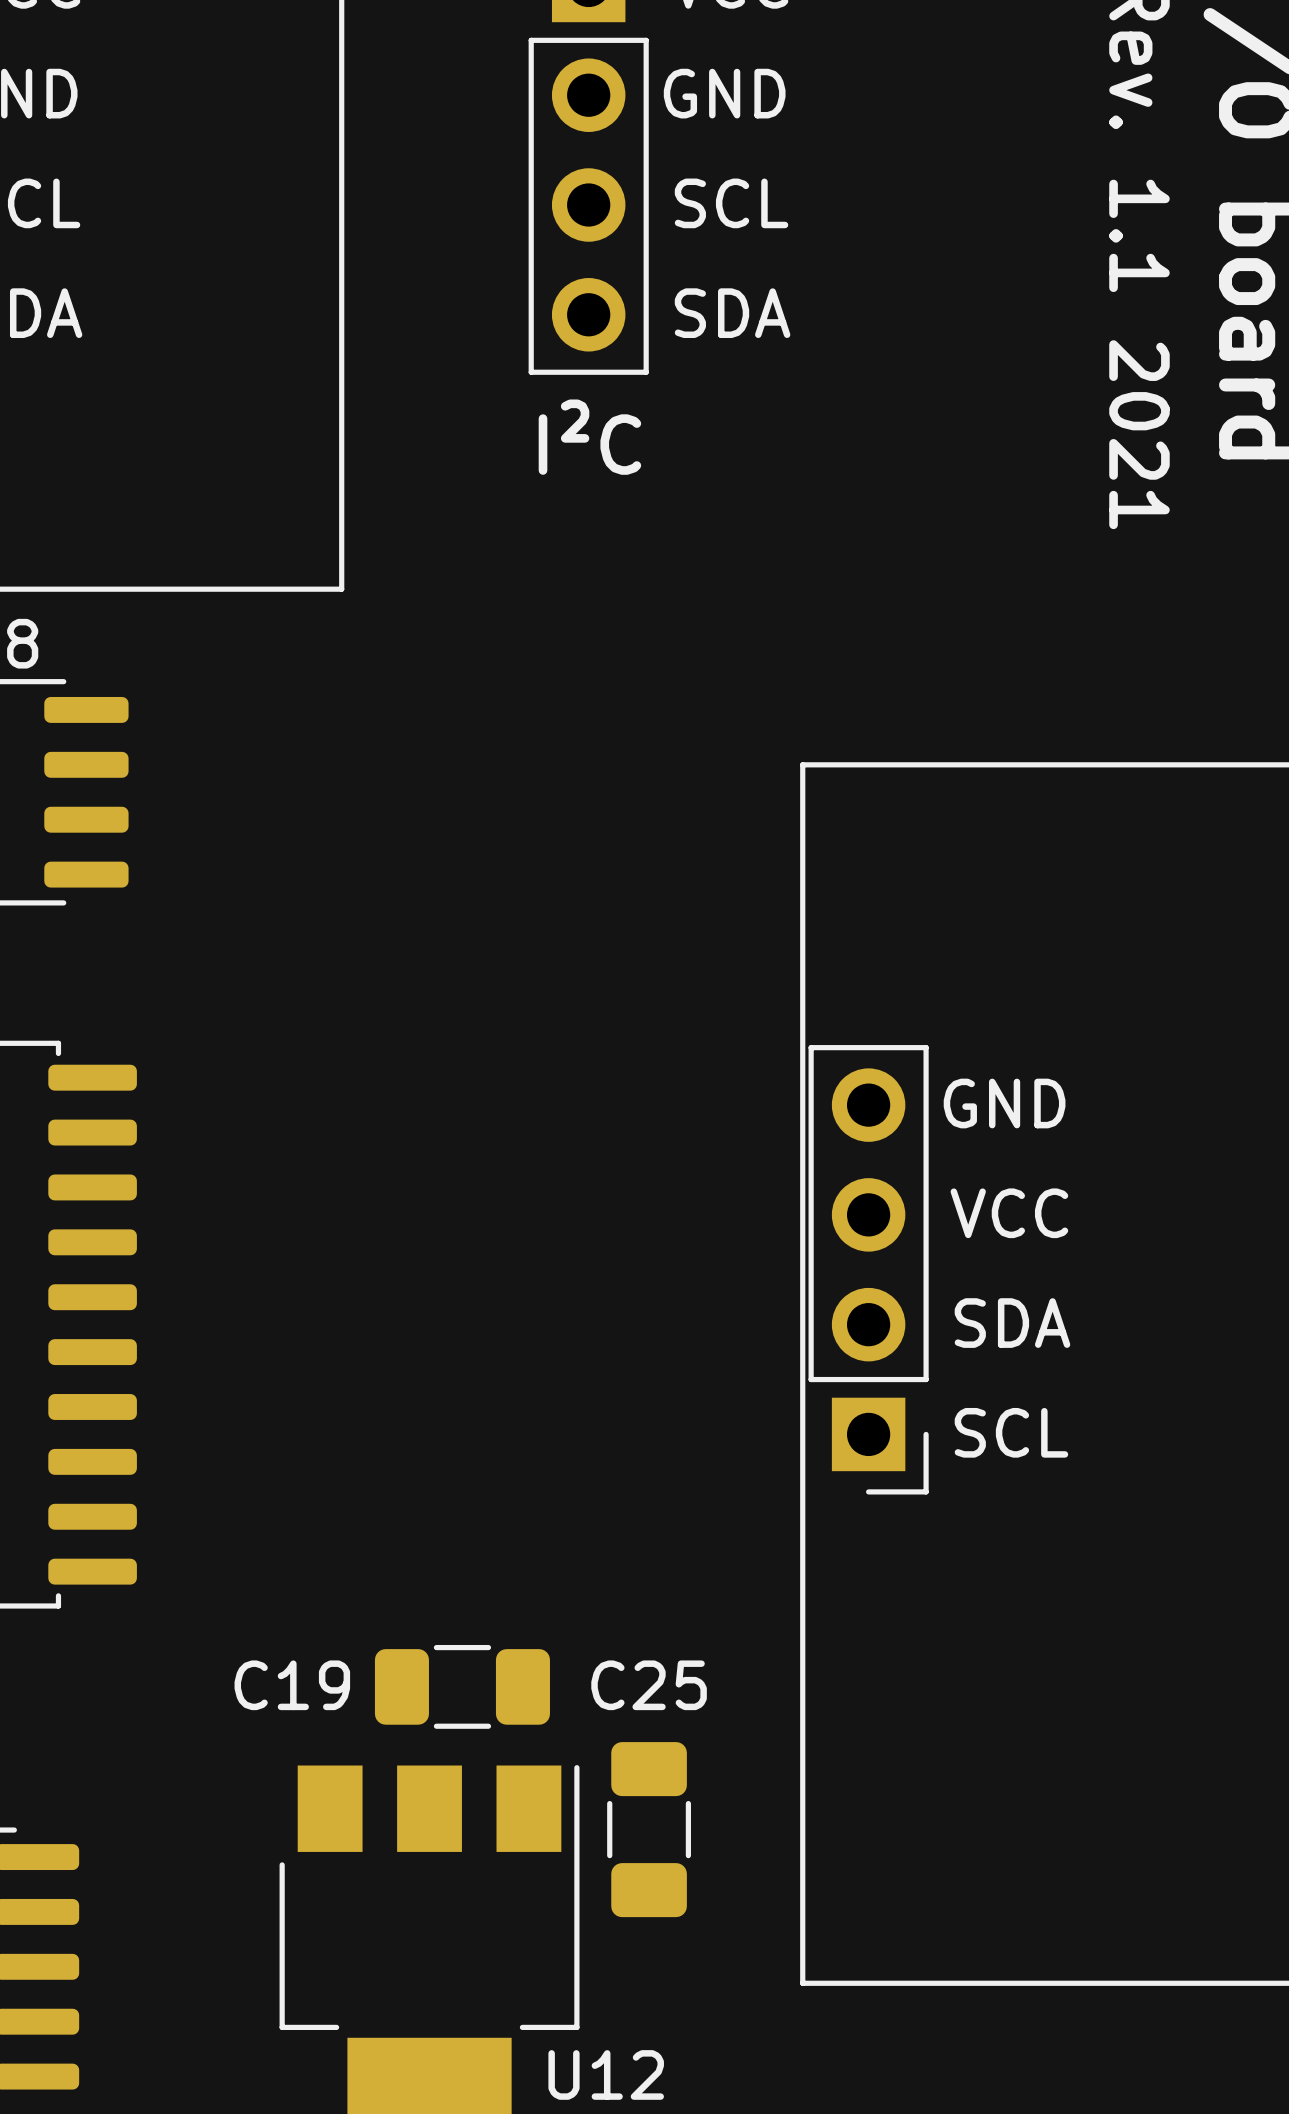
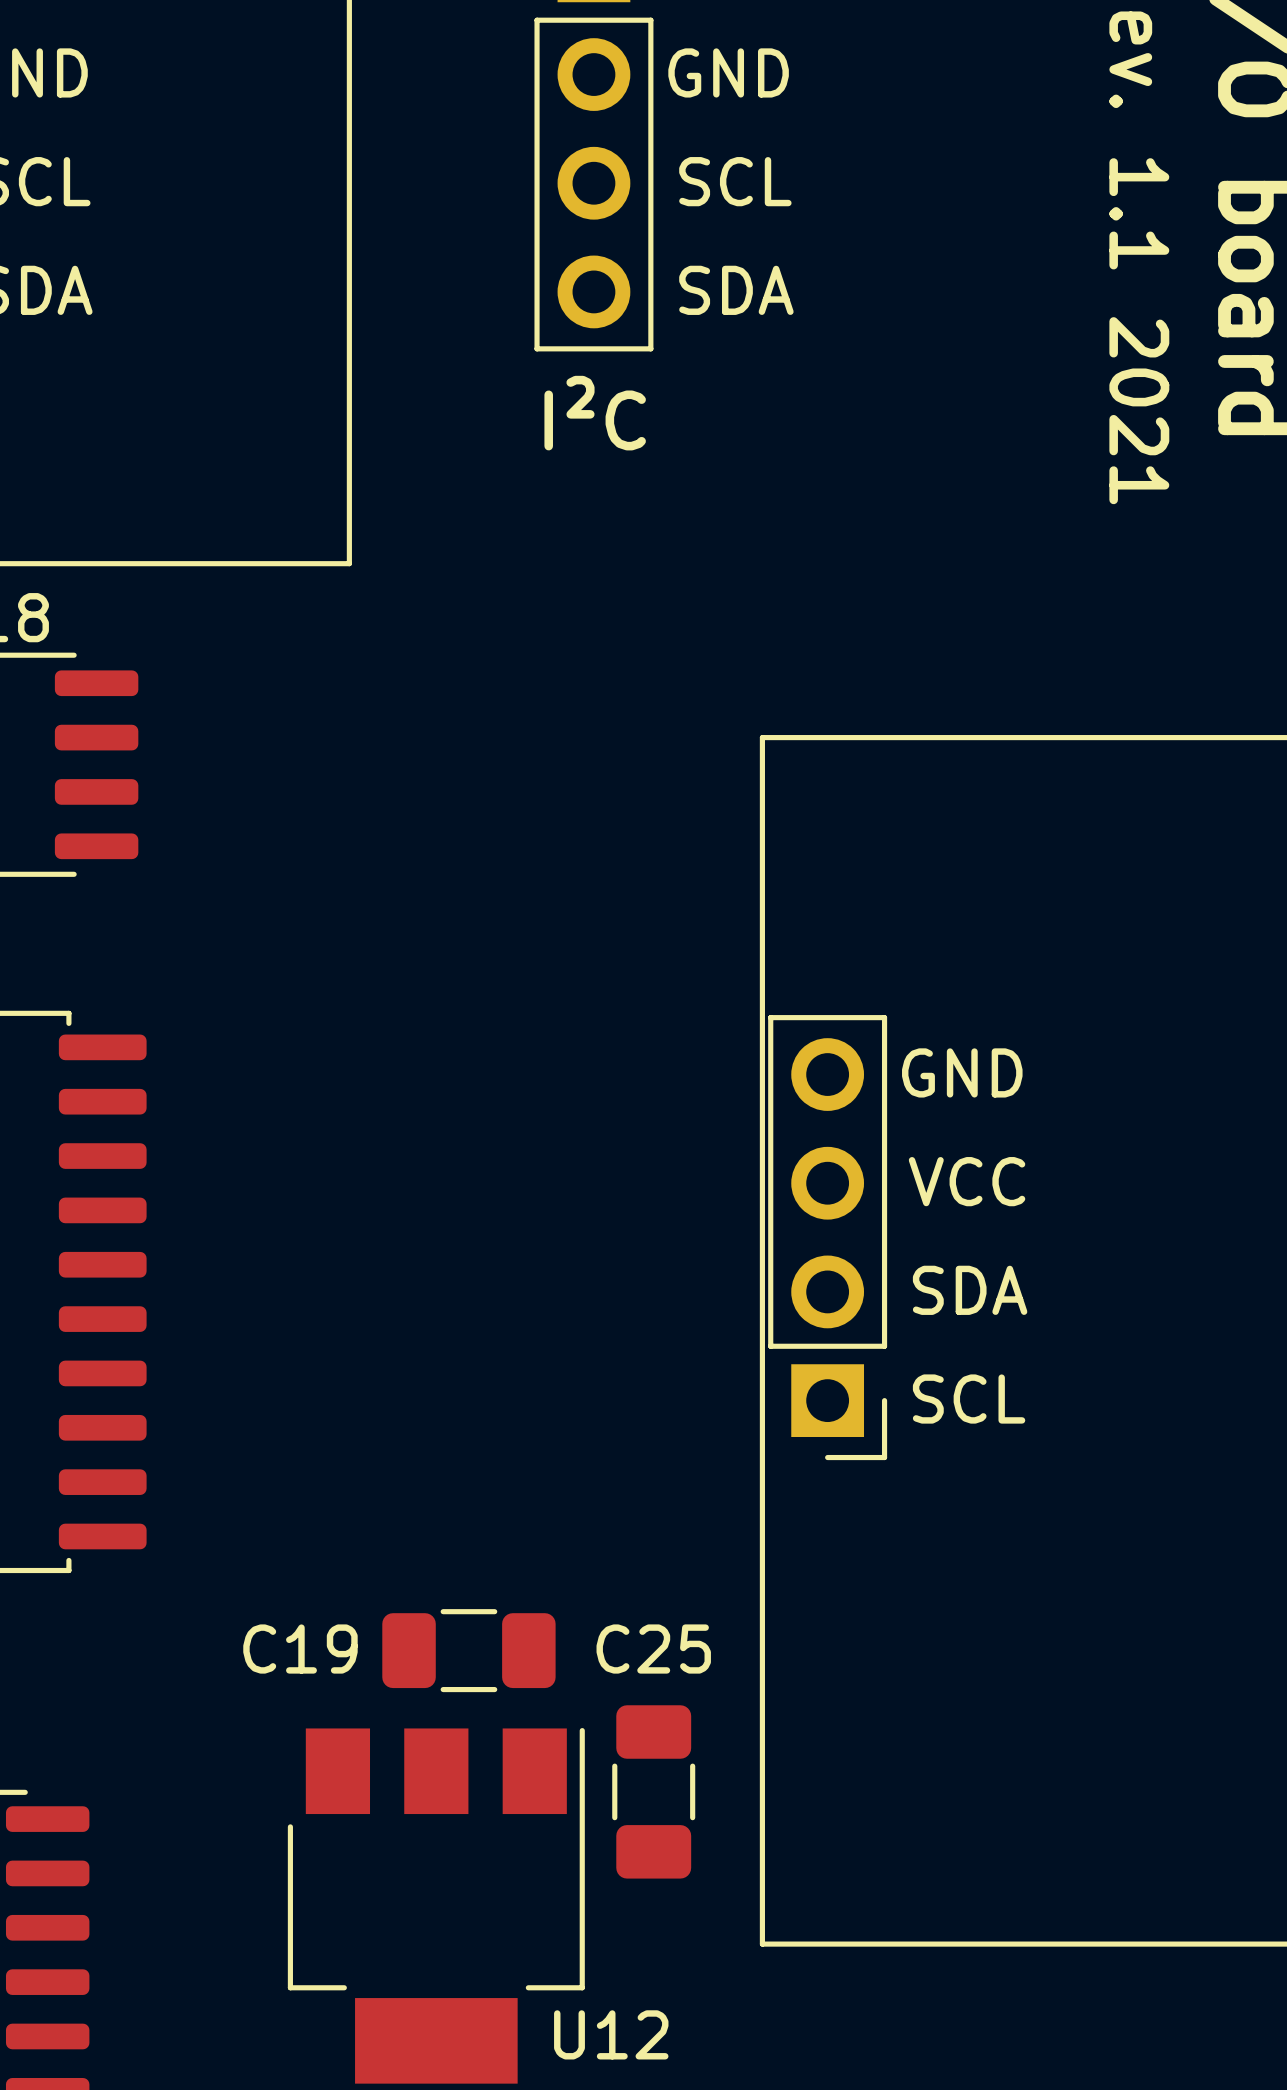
line: (802, 764) (802, 1983) -> (805, 737) (762, 737) (762, 1944) (805, 1944)
text position: GND (1004, 1103) -> GND (962, 1072)
text position: VCC (1009, 1213) -> VCC (967, 1181)
part position: (868, 1269) -> (827, 1237)
text position: SDA (1012, 1323) -> SDA (970, 1290)
text position: SCL (1011, 1432) -> SCL (969, 1399)

